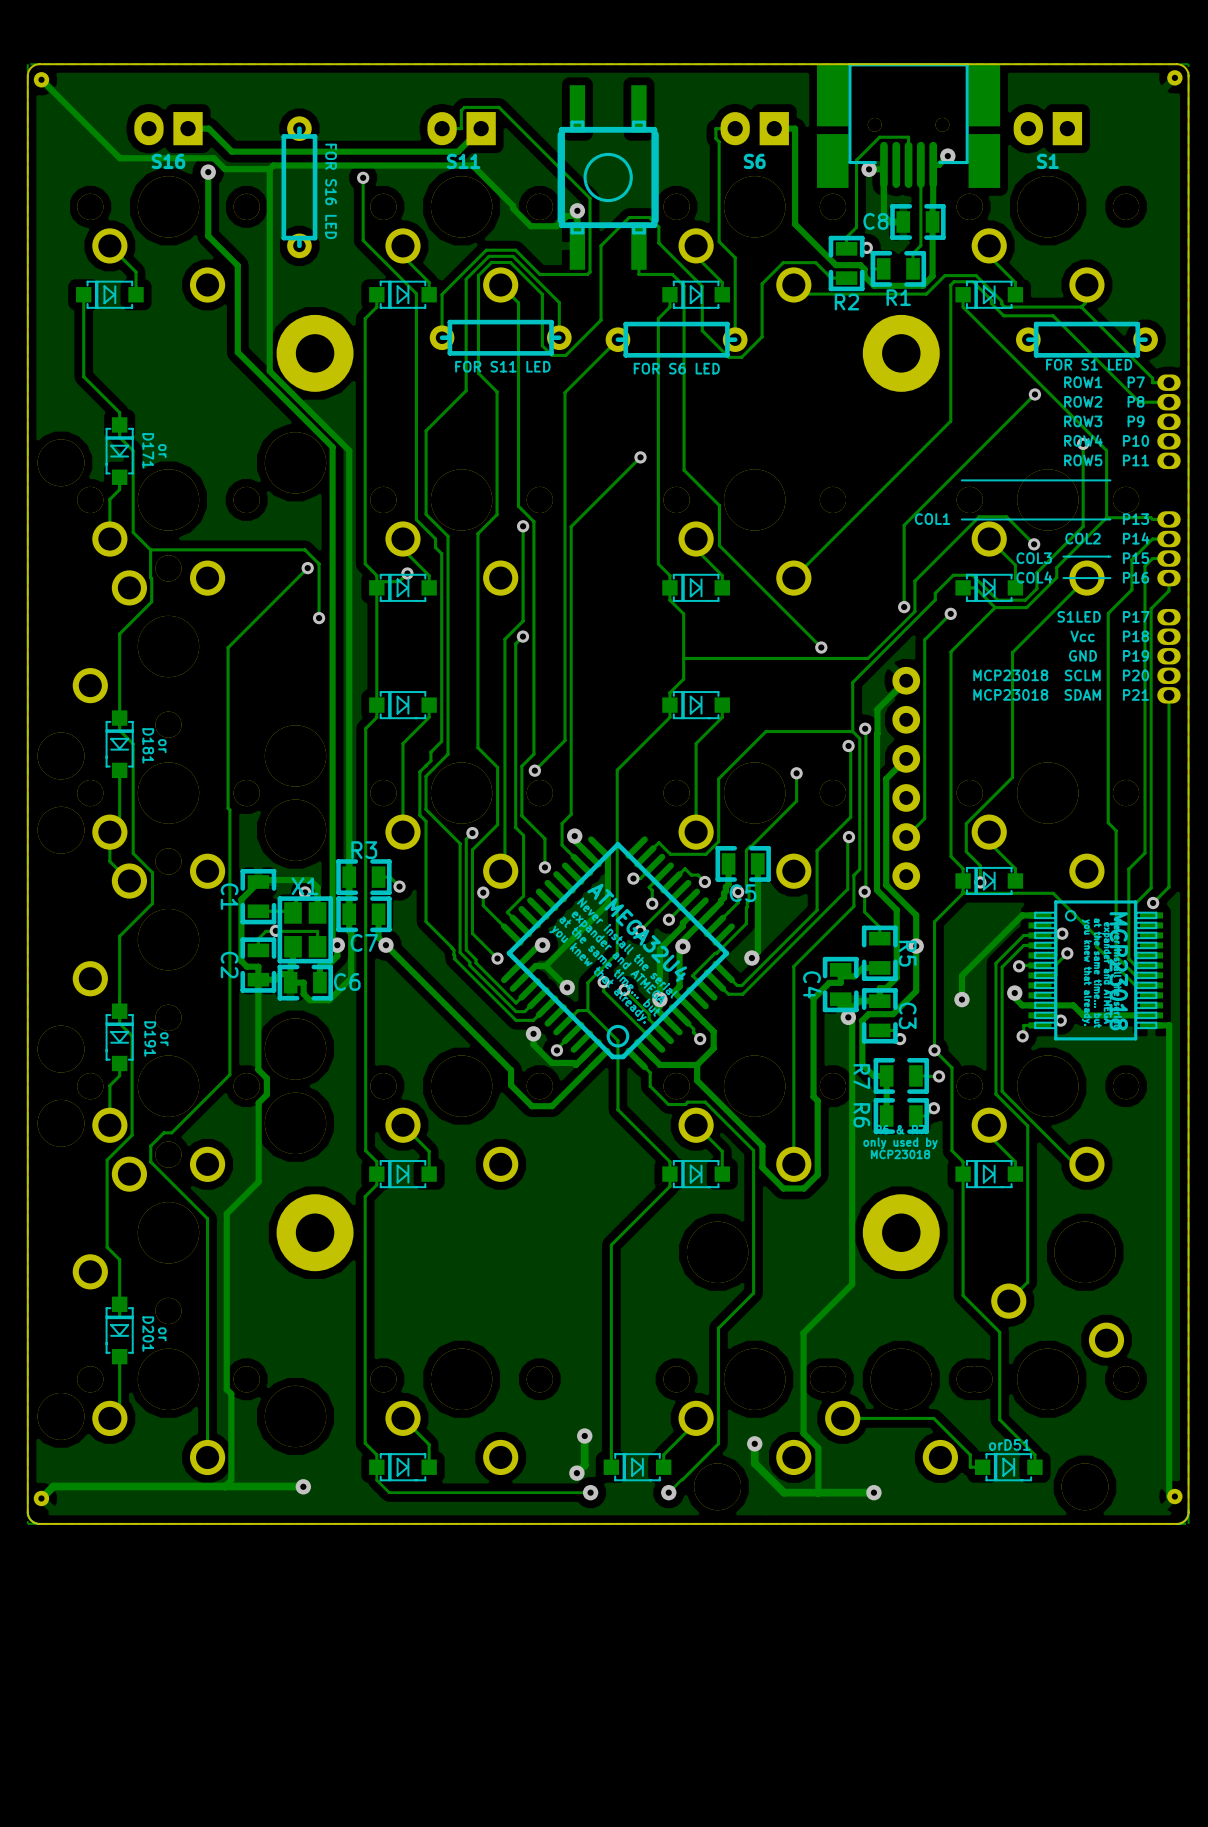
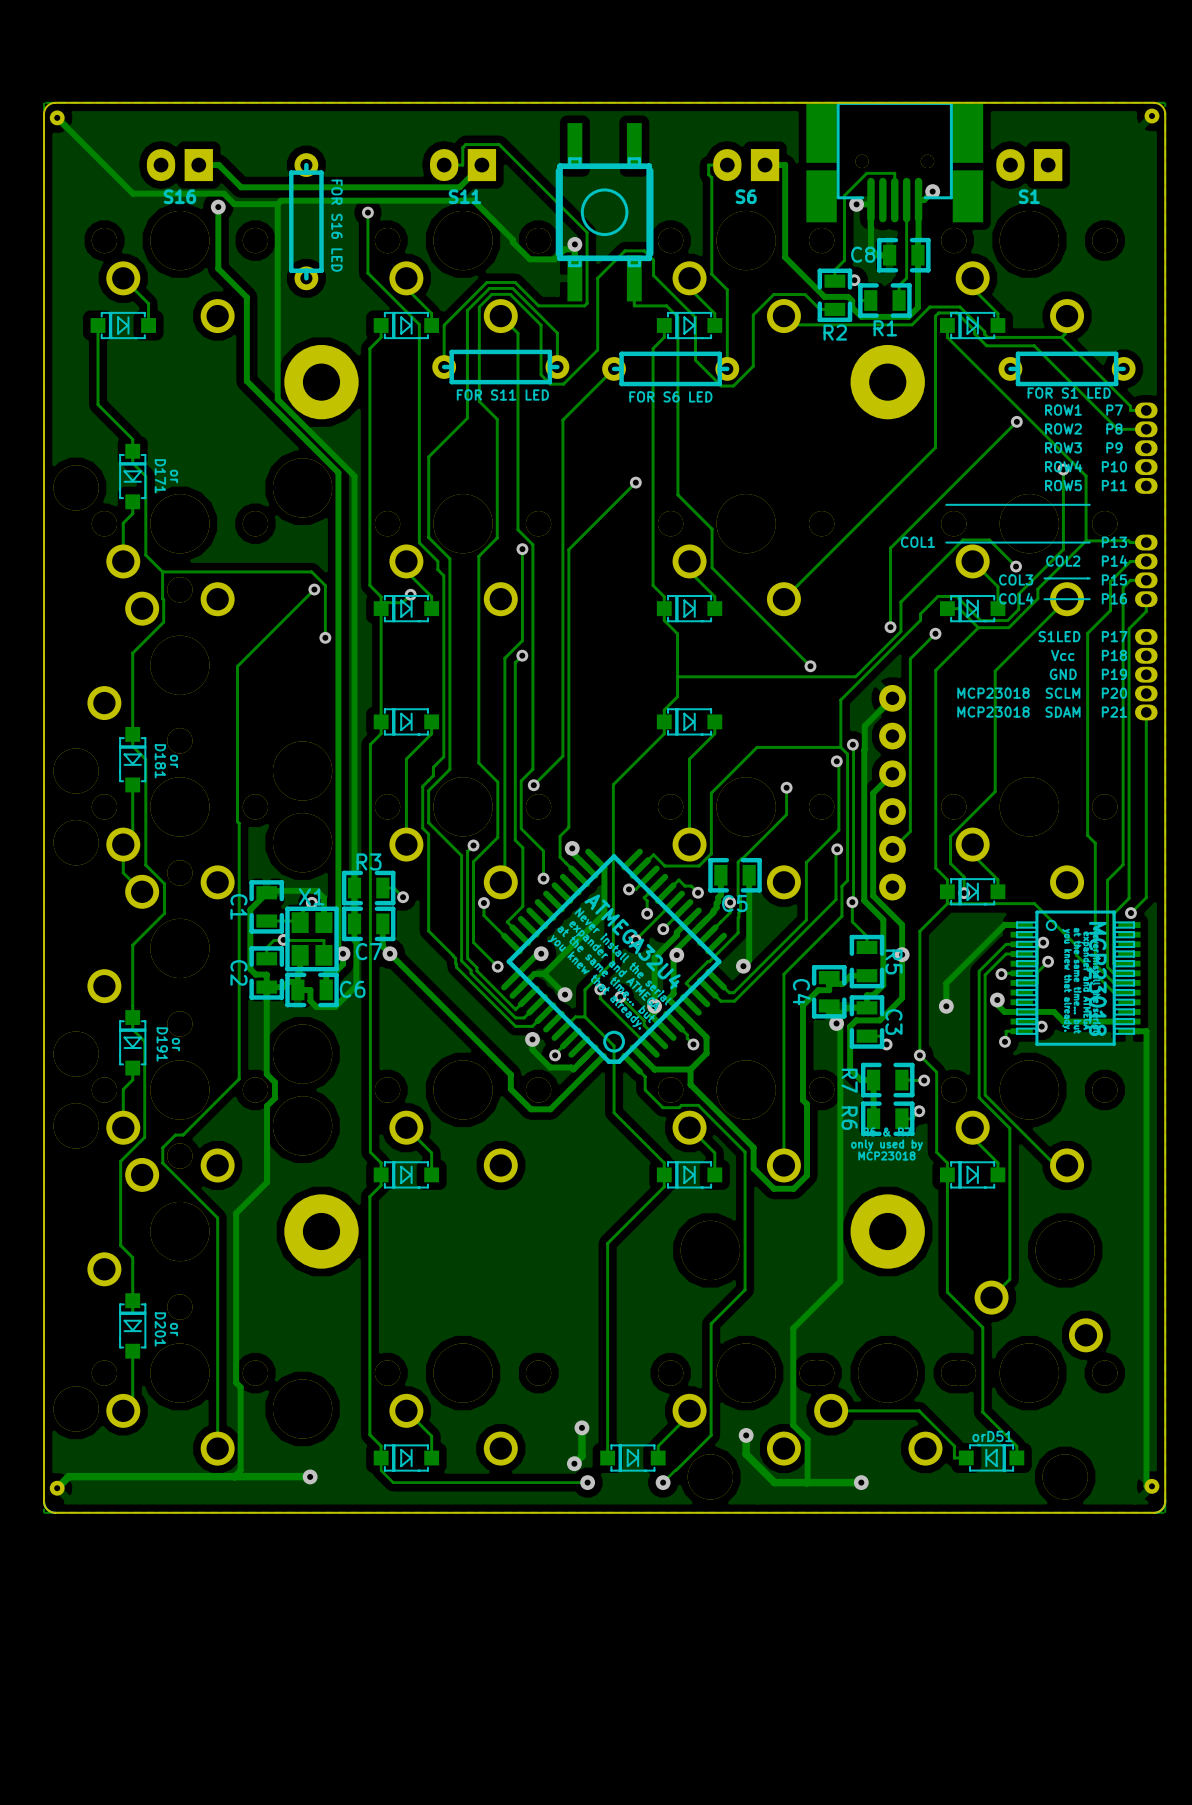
part rotation: 0° (1008, 1467) -> 180° (991, 1457)

